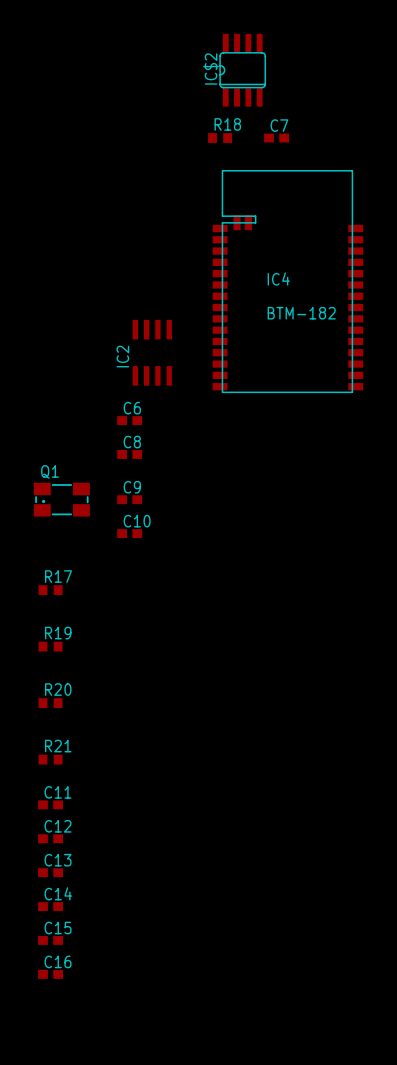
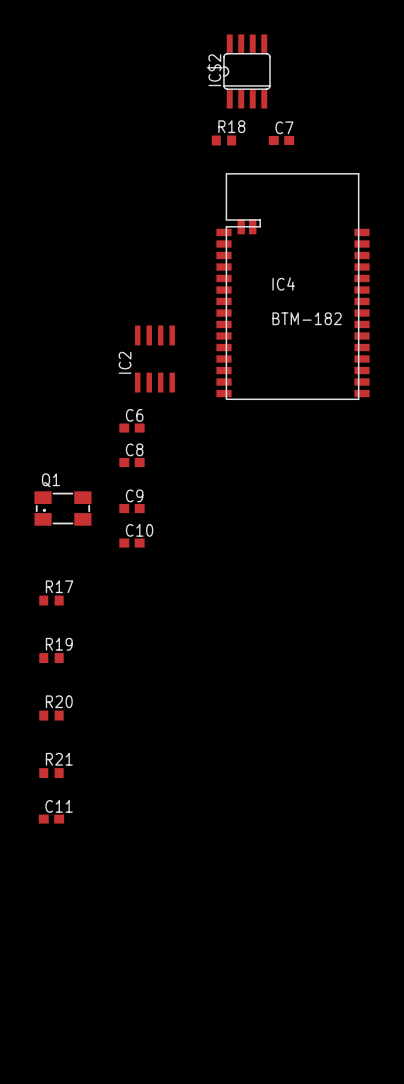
C12: (50, 838) -> none
C13: (50, 872) -> none
C14: (50, 906) -> none
C15: (50, 940) -> none
C16: (50, 974) -> none

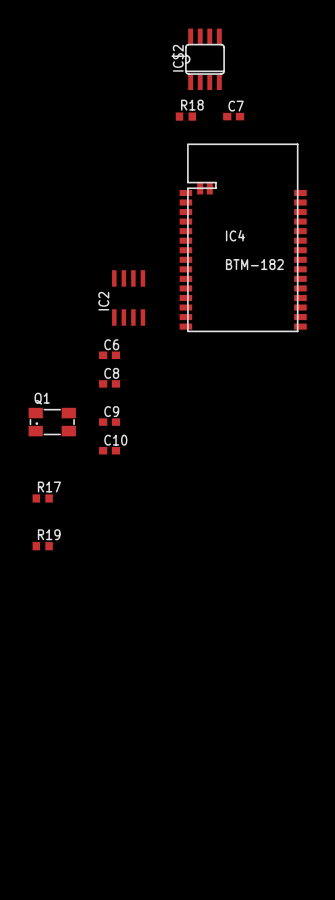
R20: (51, 715) -> none
R21: (51, 773) -> none
C11: (51, 819) -> none

